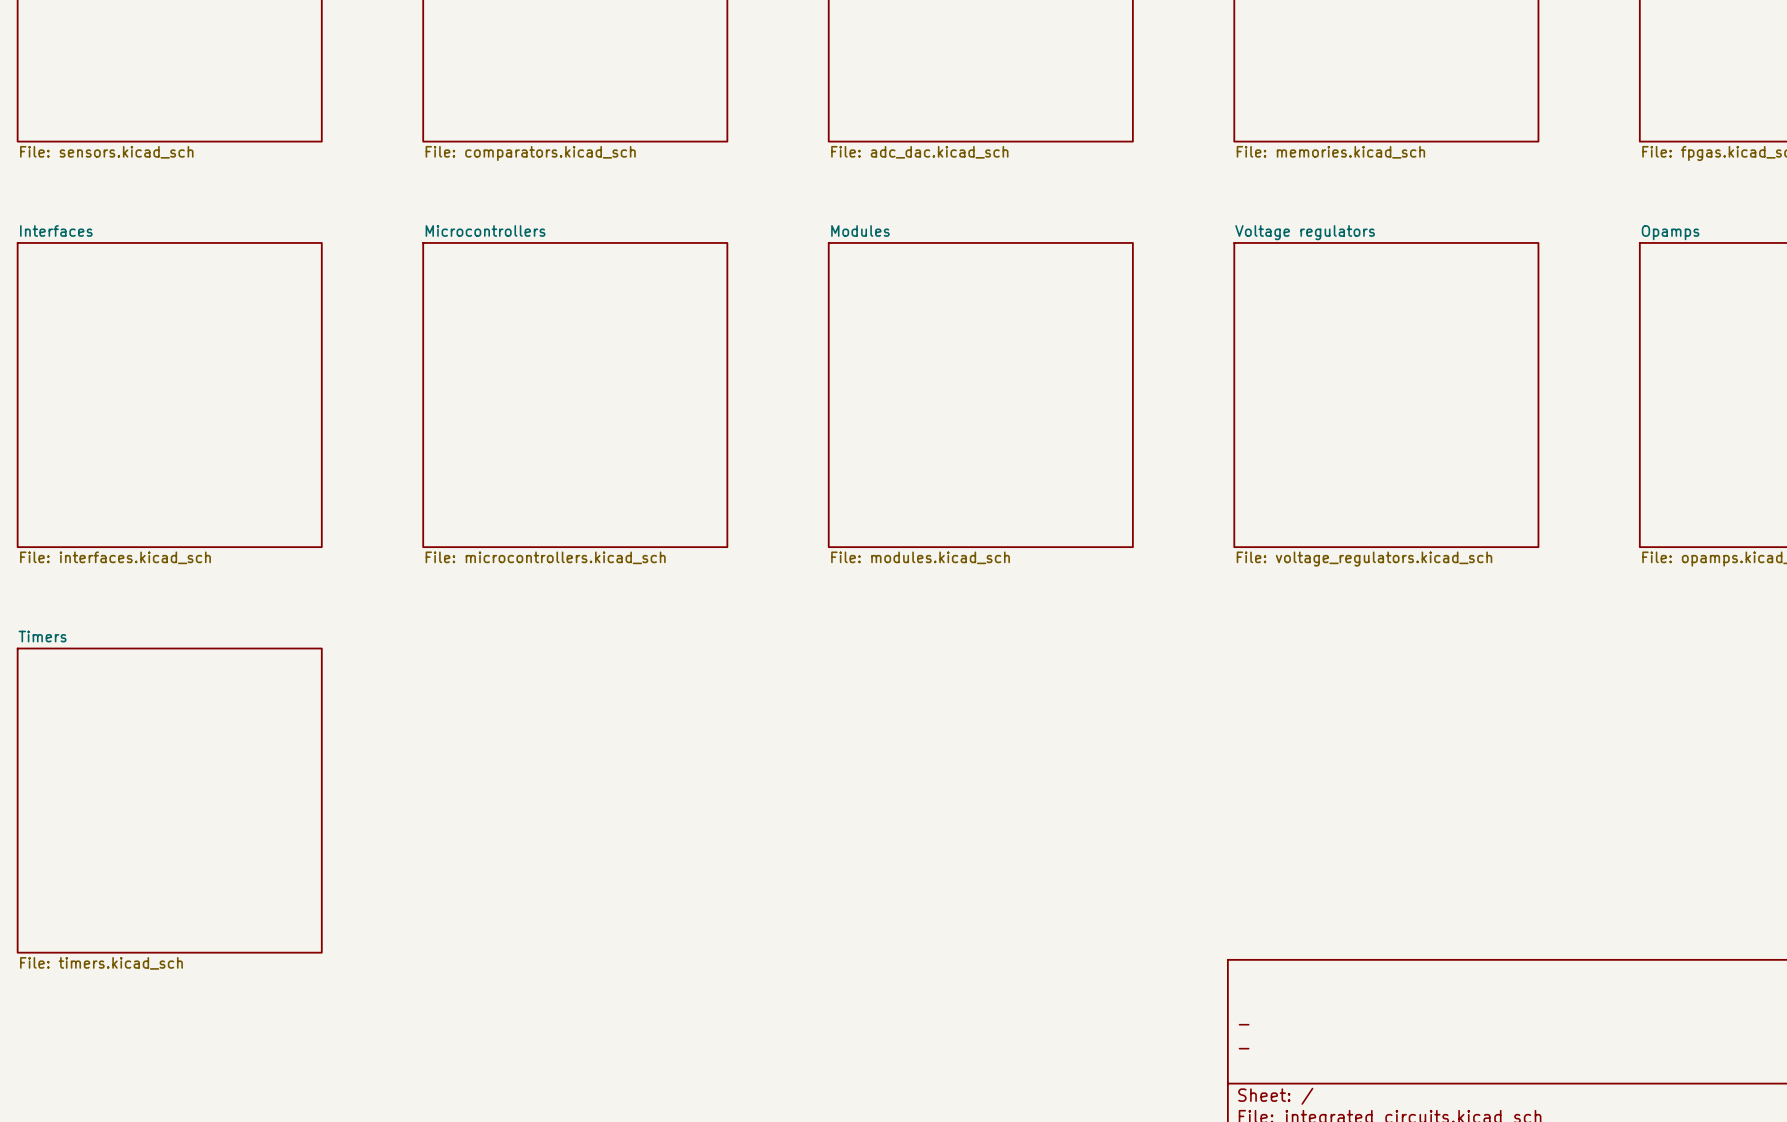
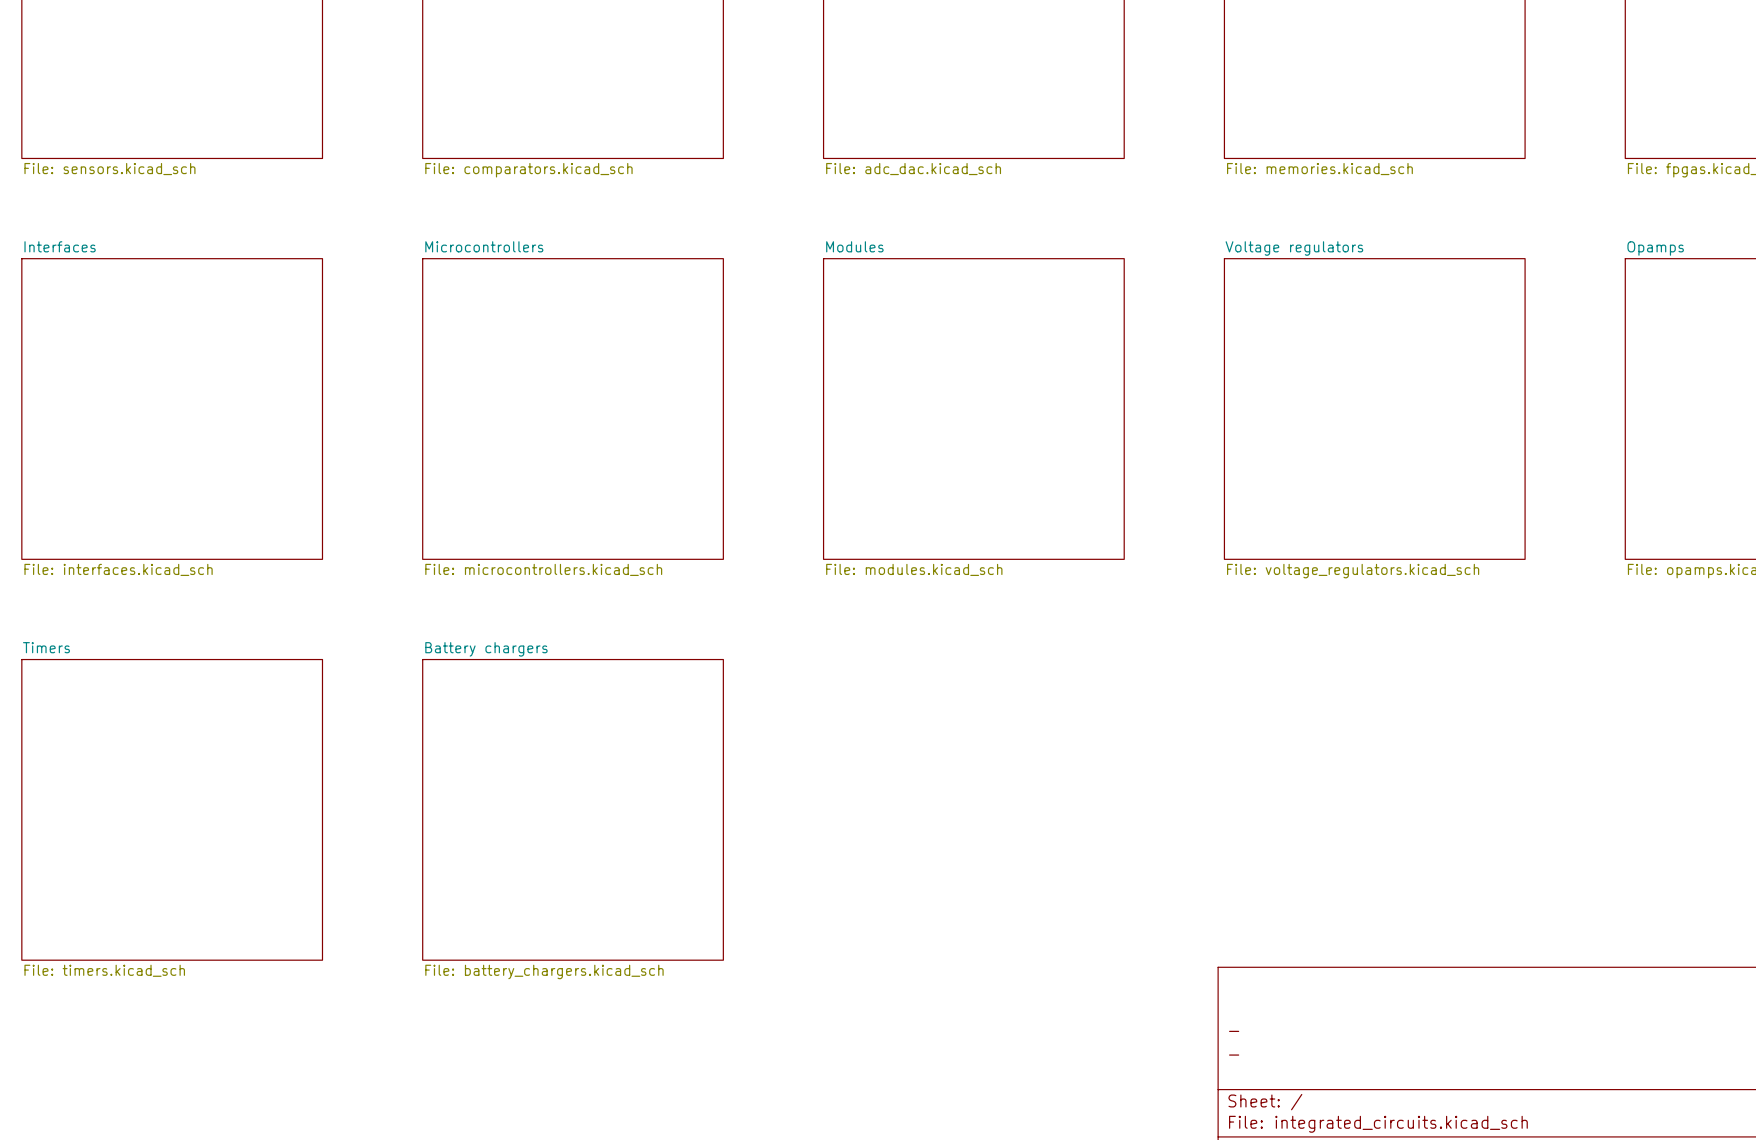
sheet Battery chargers: none -> File: battery_chargers.kicad_sch (573, 809)

